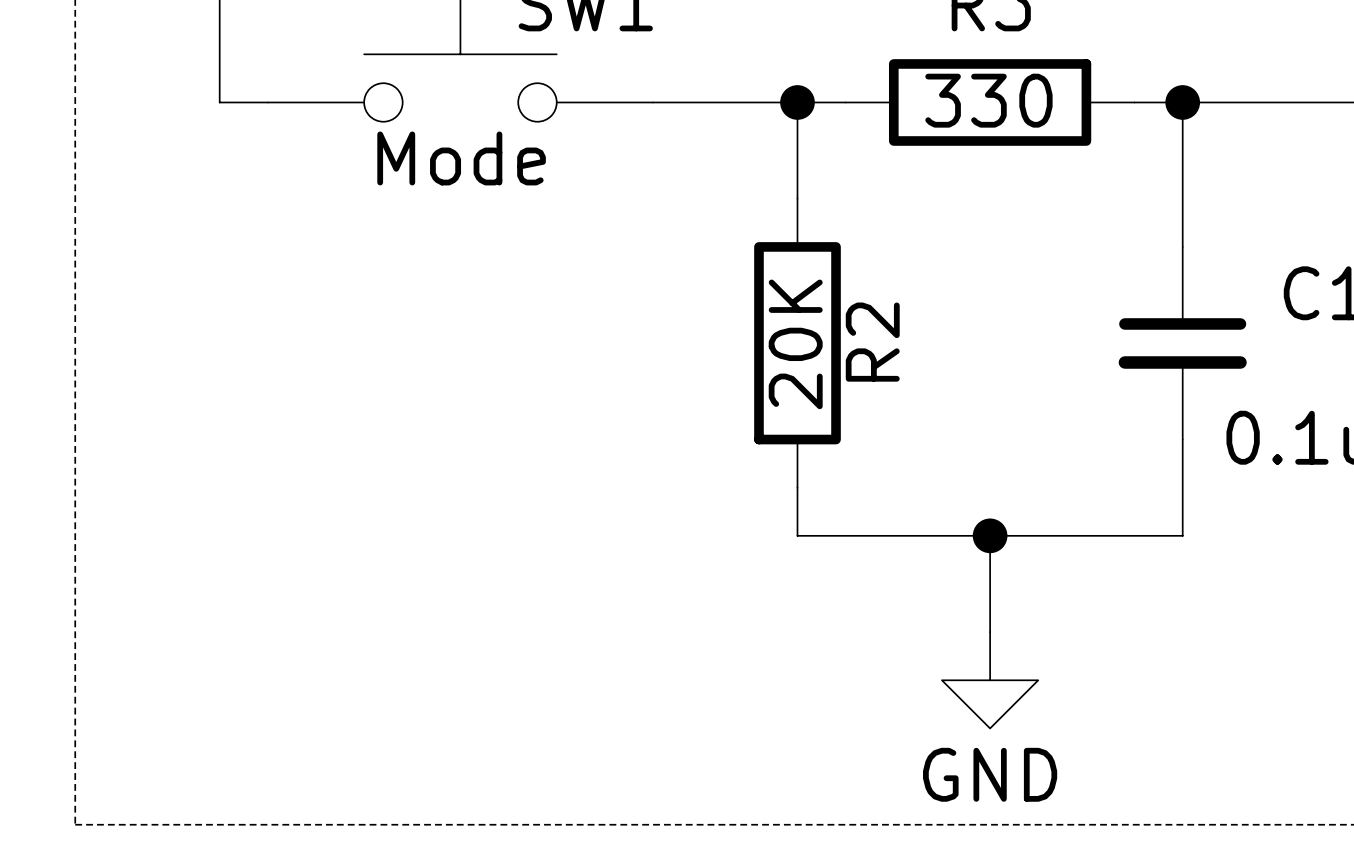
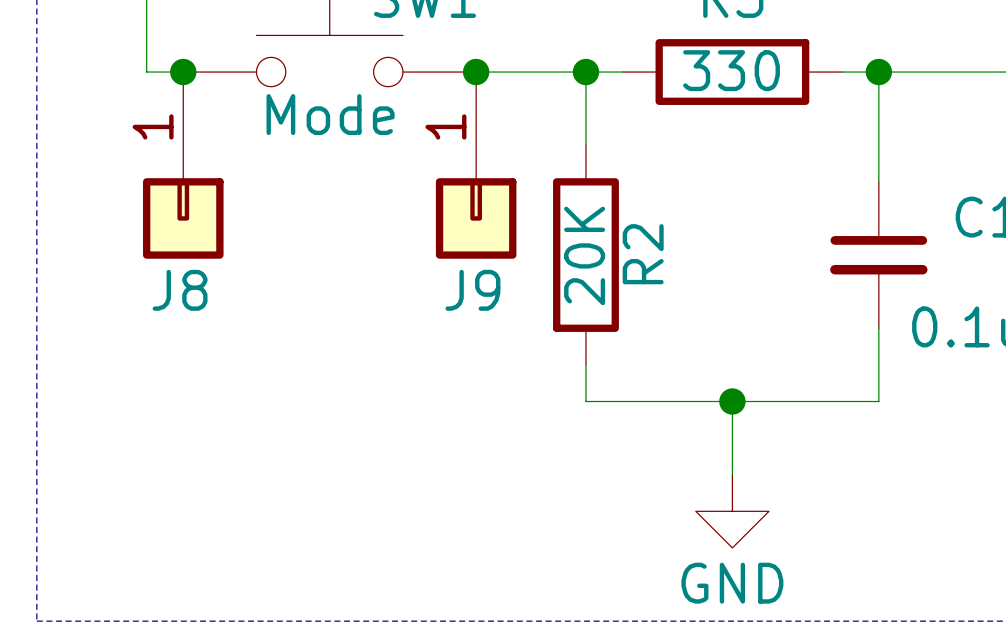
junction: none -> (183, 72)
junction: none -> (476, 72)
J8: none -> (183, 165)
J9: none -> (476, 165)

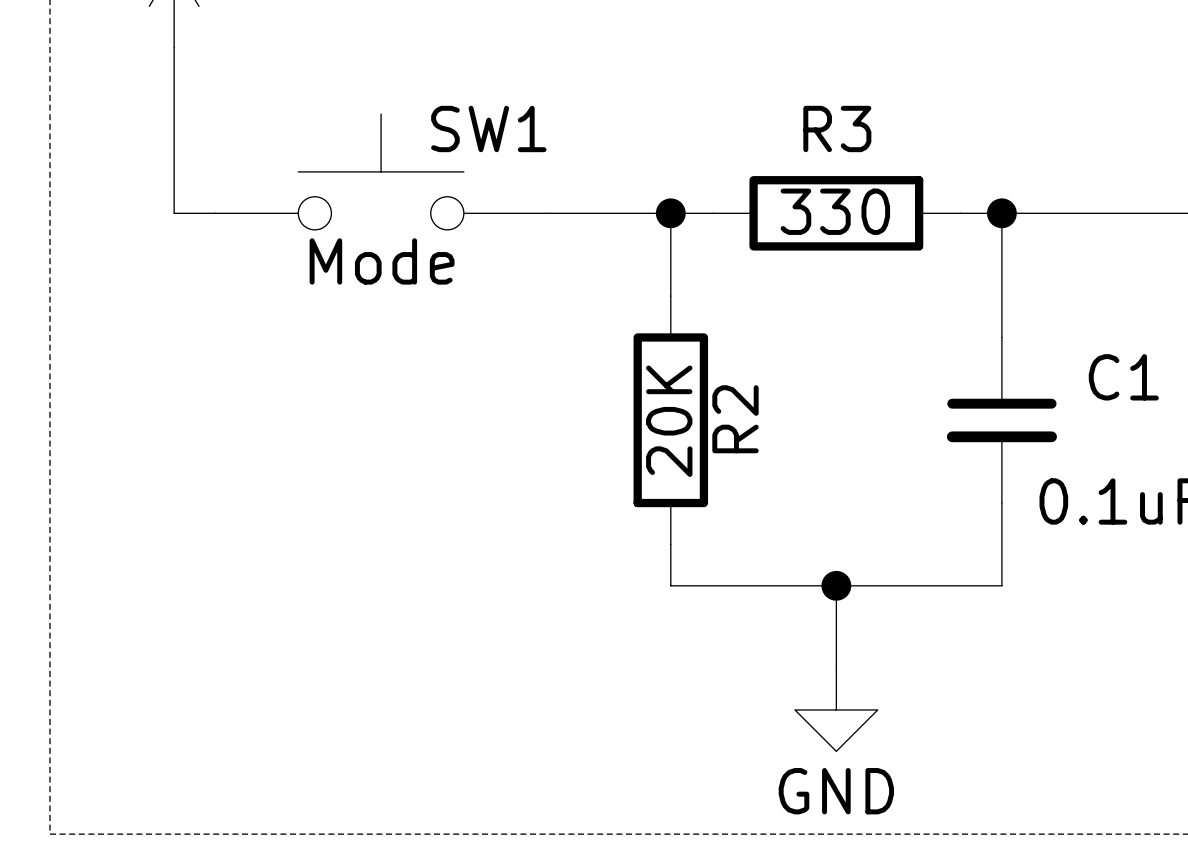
junction: (183, 72) -> none
junction: (476, 72) -> none
J8: (183, 165) -> none
J9: (476, 165) -> none

